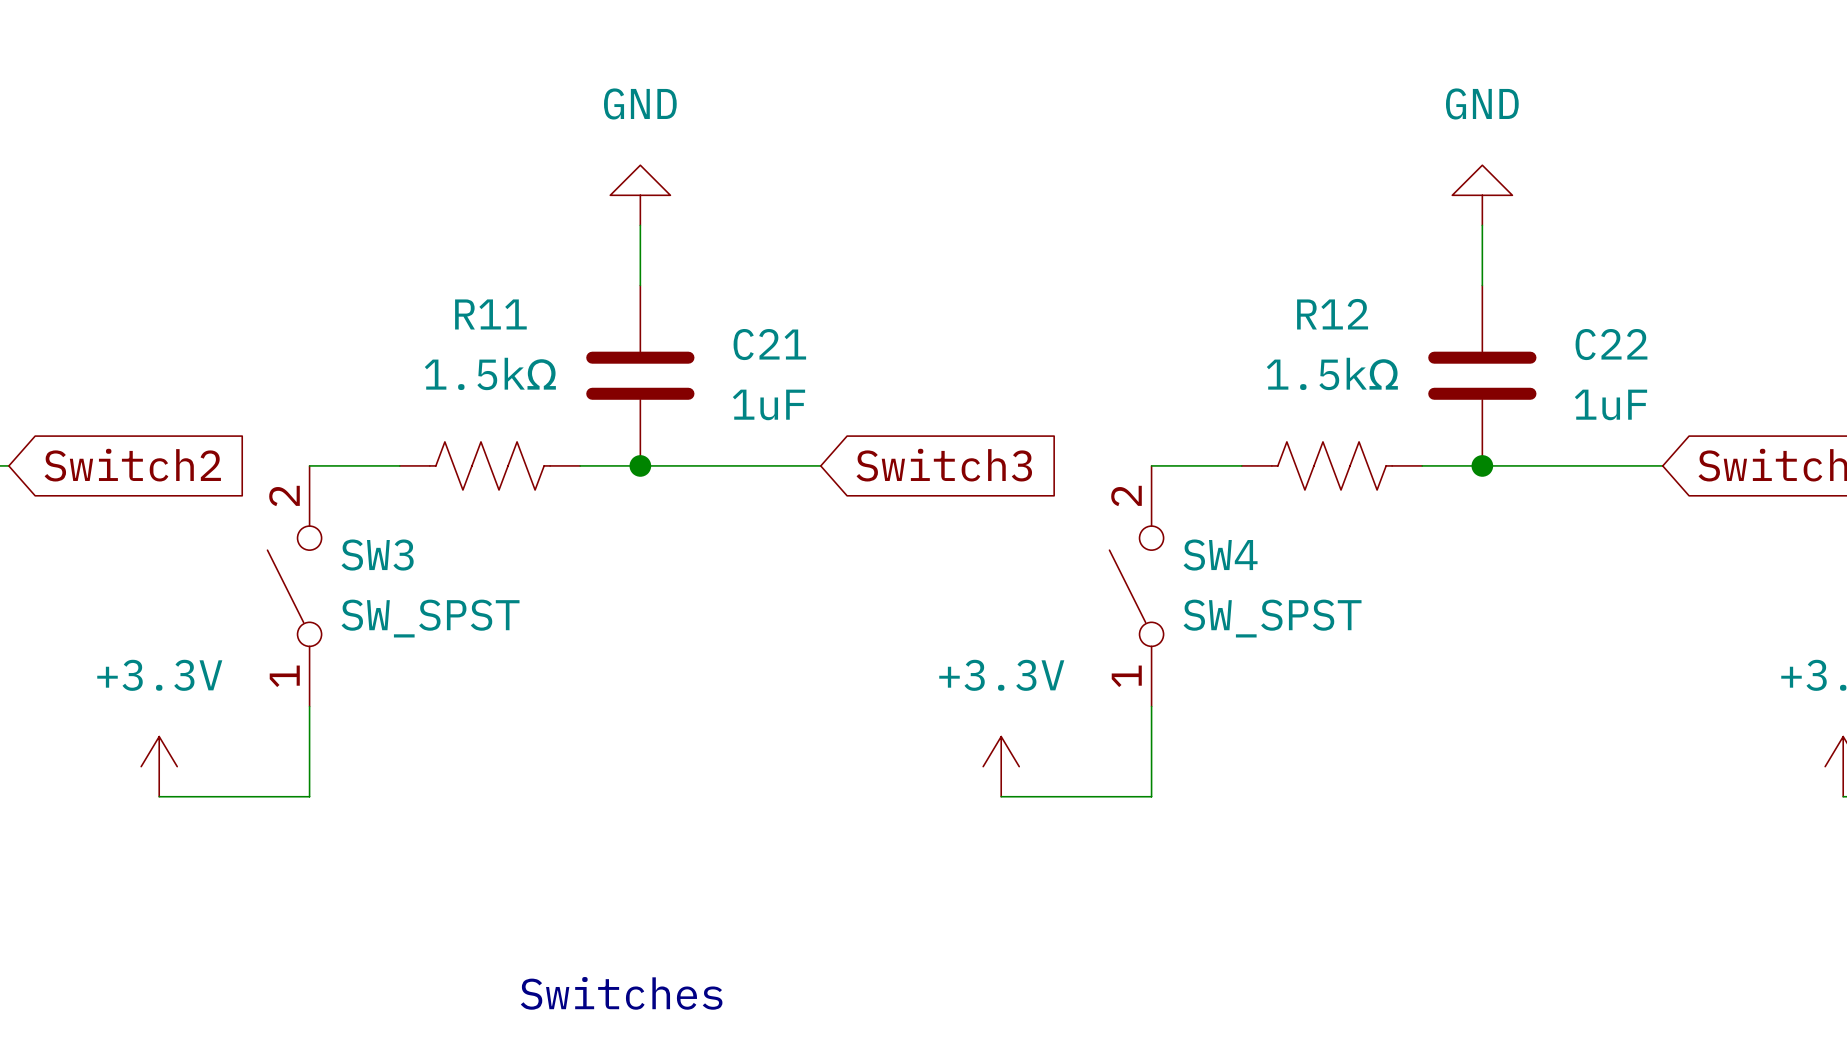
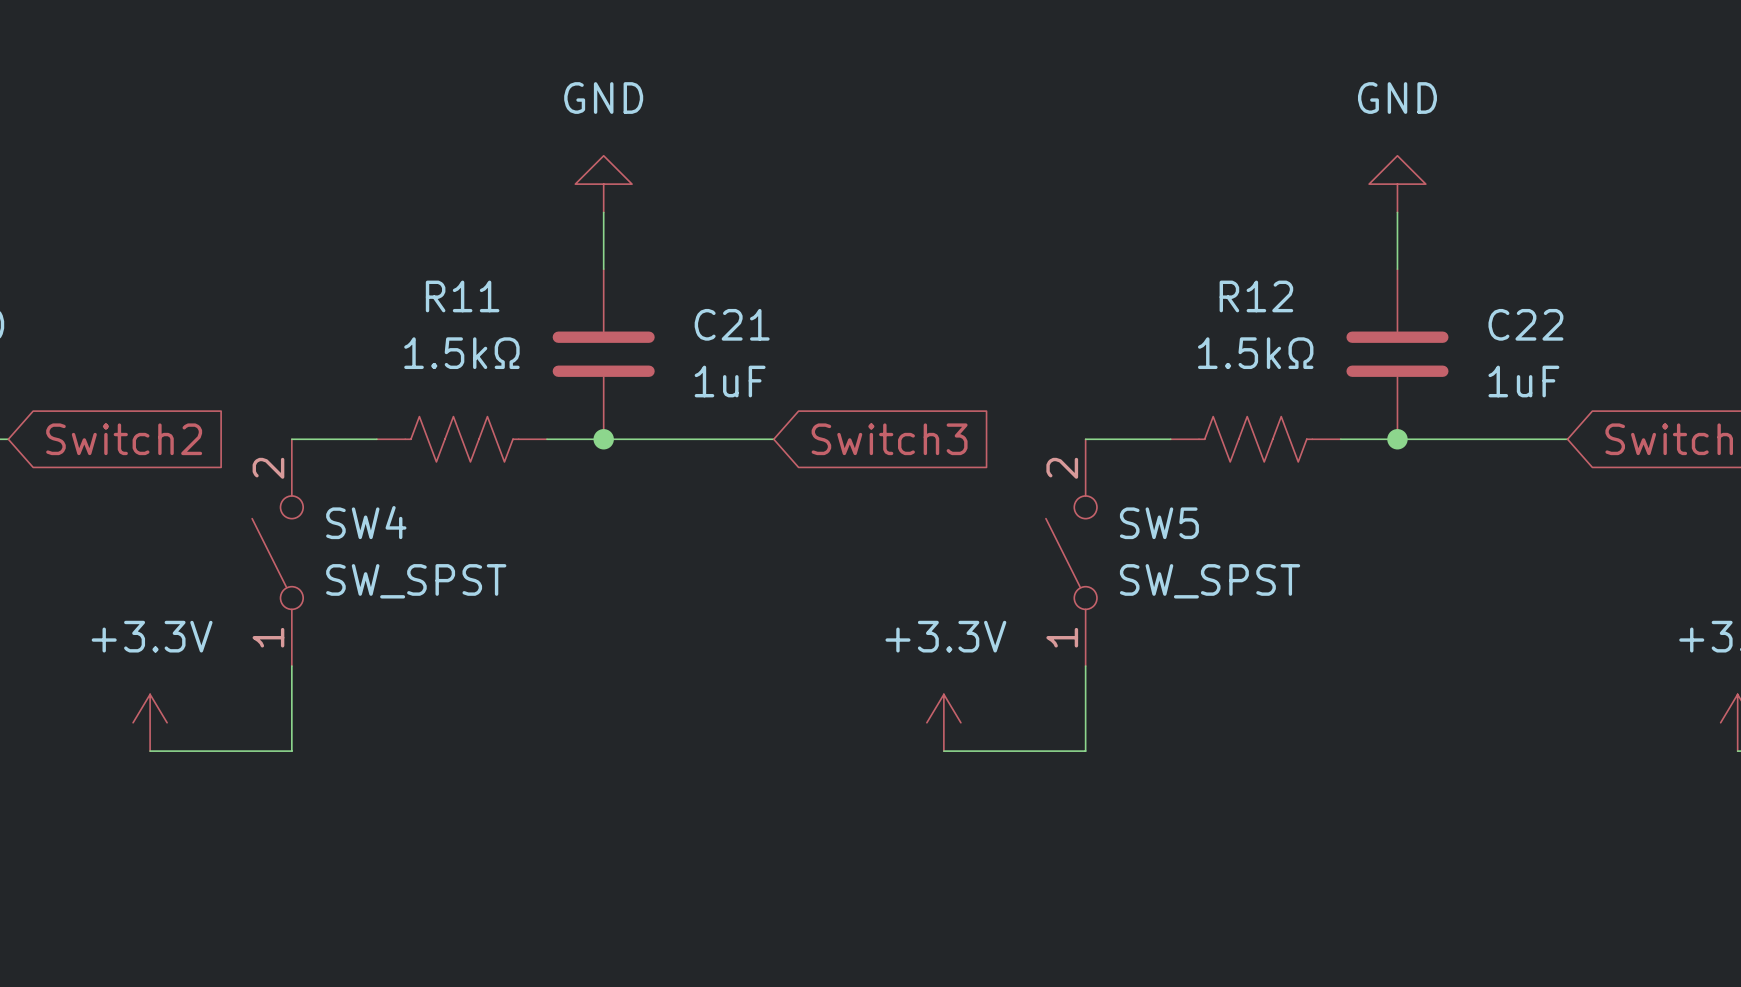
SW3 name: SW3 (377, 555) -> SW4 (366, 522)
SW4 name: SW4 (1220, 555) -> SW5 (1159, 523)
text: Switches (621, 993) -> none

